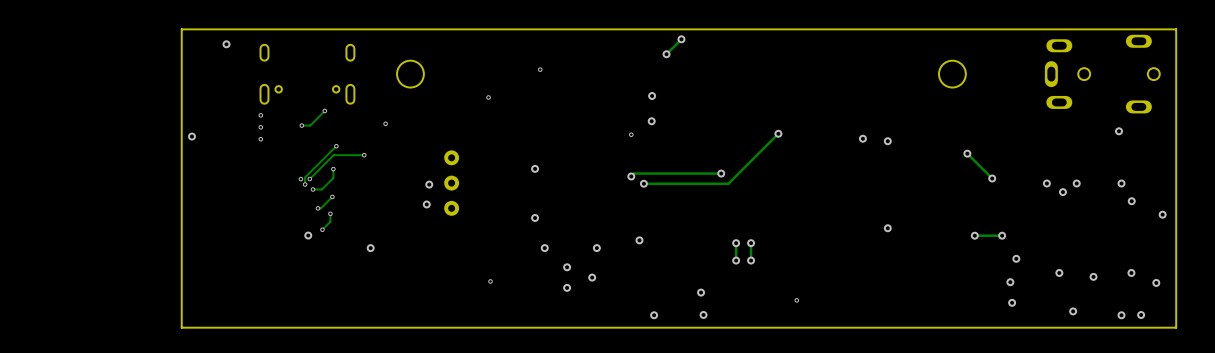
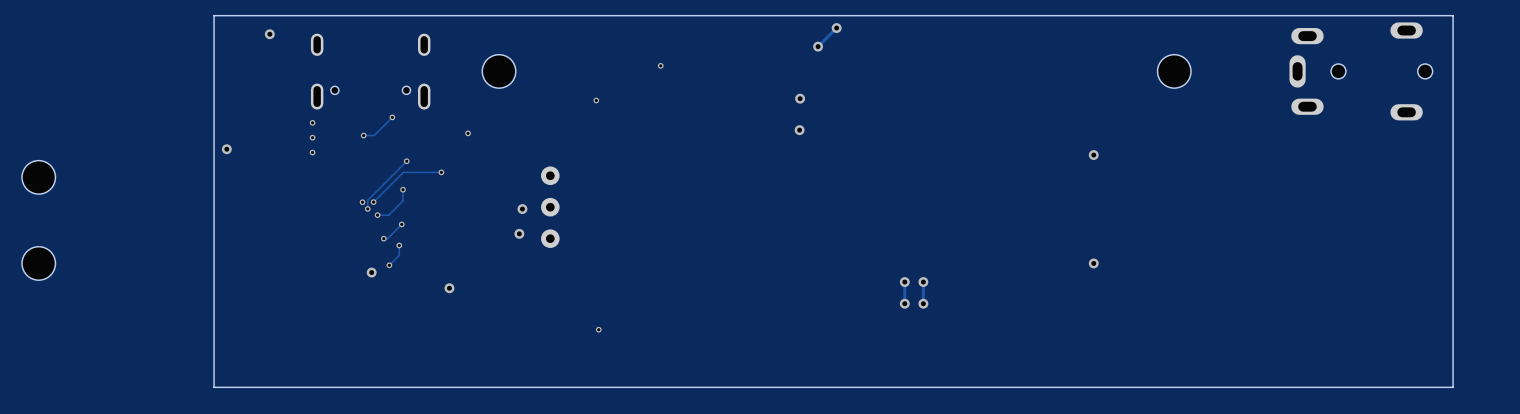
via: (1119, 131) -> none
track: (778, 133) (728, 183) (643, 183) -> none
via: (778, 133) -> none
via: (631, 134) -> none
via: (862, 138) -> none
track: (967, 153) (992, 178) -> none
via: (967, 153) -> none
part: none -> (38, 177)
via: (535, 168) -> none
track: (721, 173) (634, 173) (631, 176) -> none
via: (721, 173) -> none
via: (631, 176) -> none
via: (992, 178) -> none
via: (643, 183) -> none
via: (1046, 183) -> none
via: (1076, 183) -> none
via: (1121, 183) -> none
via: (1062, 192) -> none
via: (1131, 201) -> none
via: (1162, 214) -> none
via: (535, 218) -> none
part: none -> (38, 263)
via: (974, 235) -> none
track: (1002, 235) (974, 235) -> none
via: (1002, 235) -> none
via: (639, 240) -> none
via: (544, 248) -> none
via: (596, 248) -> none
via: (1016, 258) -> none
via: (567, 267) -> none
via: (1059, 272) -> none
via: (1131, 272) -> none
via: (1093, 276) -> none
via: (592, 277) -> none
via: (1010, 282) -> none
via: (1156, 282) -> none
via: (567, 287) -> none
via: (701, 292) -> none
via: (796, 300) -> none
via: (1012, 302) -> none
via: (1073, 311) -> none
via: (703, 314) -> none
via: (654, 315) -> none
via: (1121, 315) -> none
via: (1141, 315) -> none

